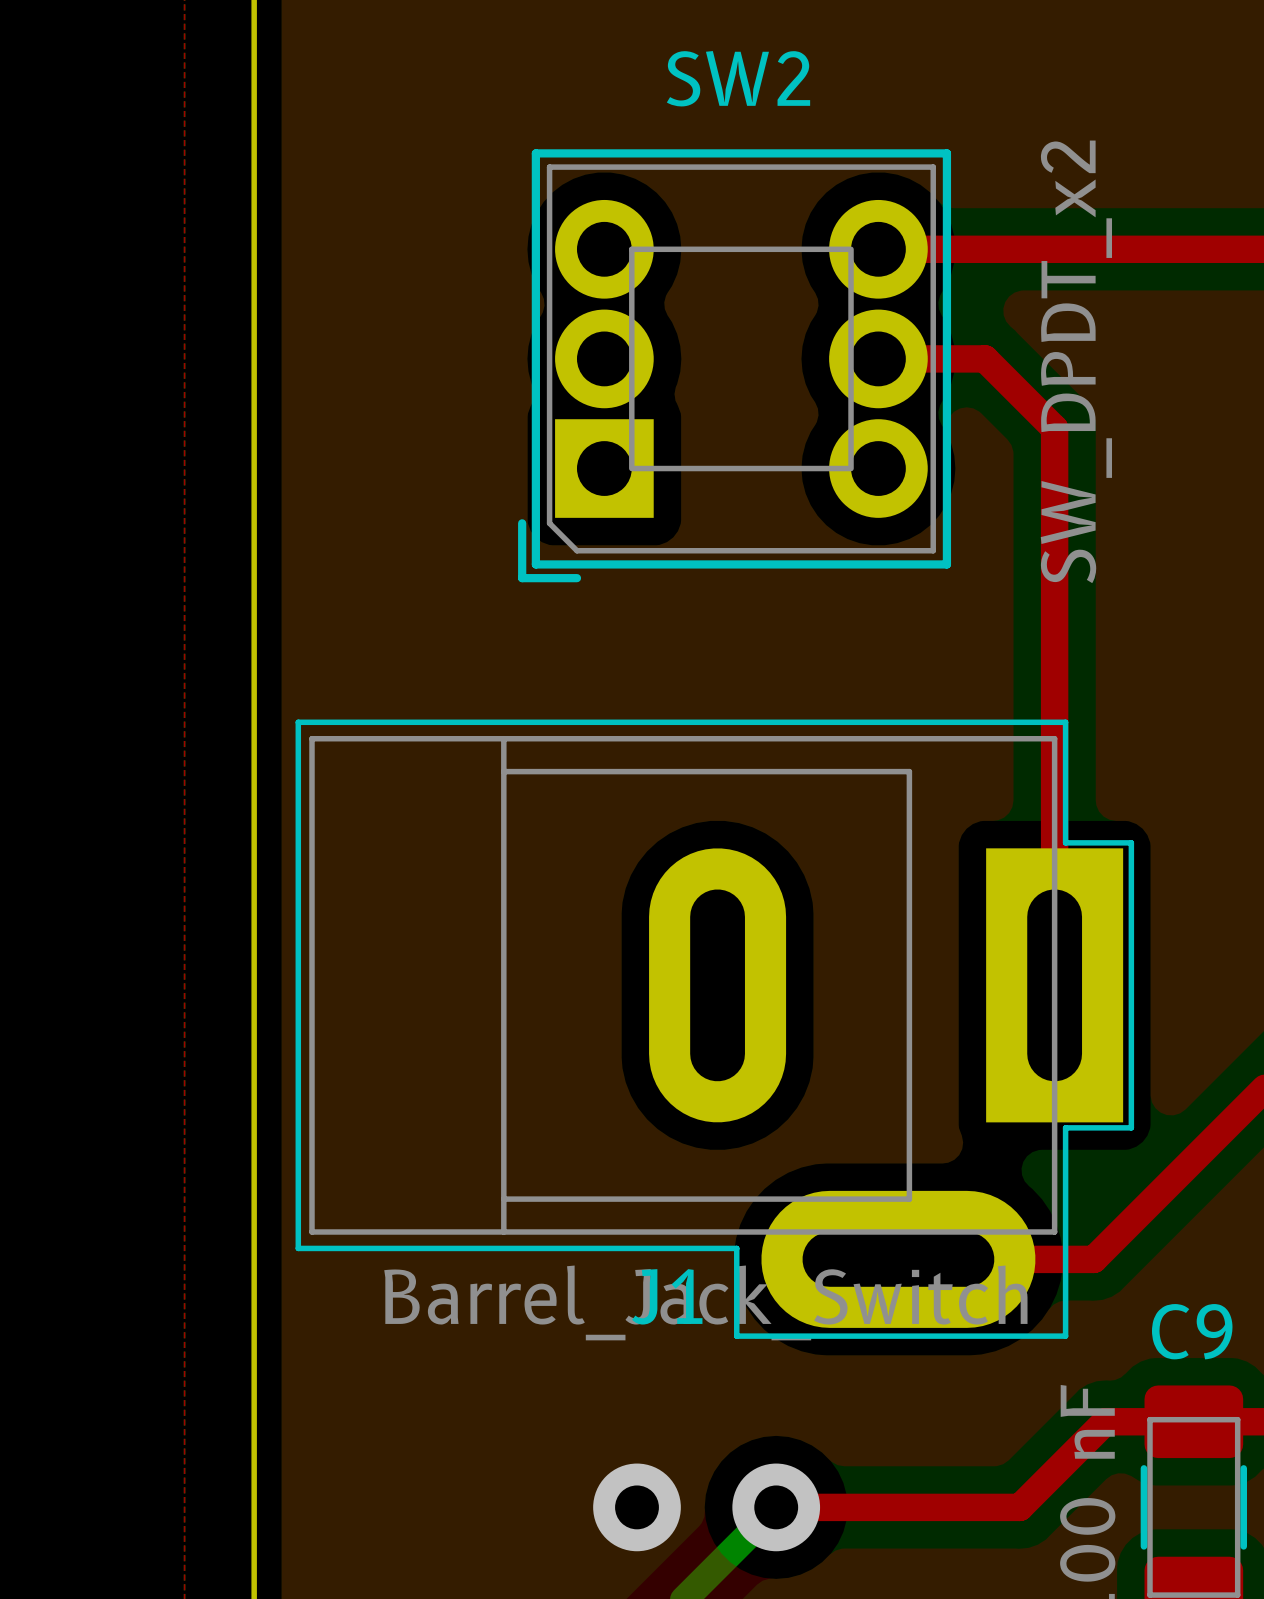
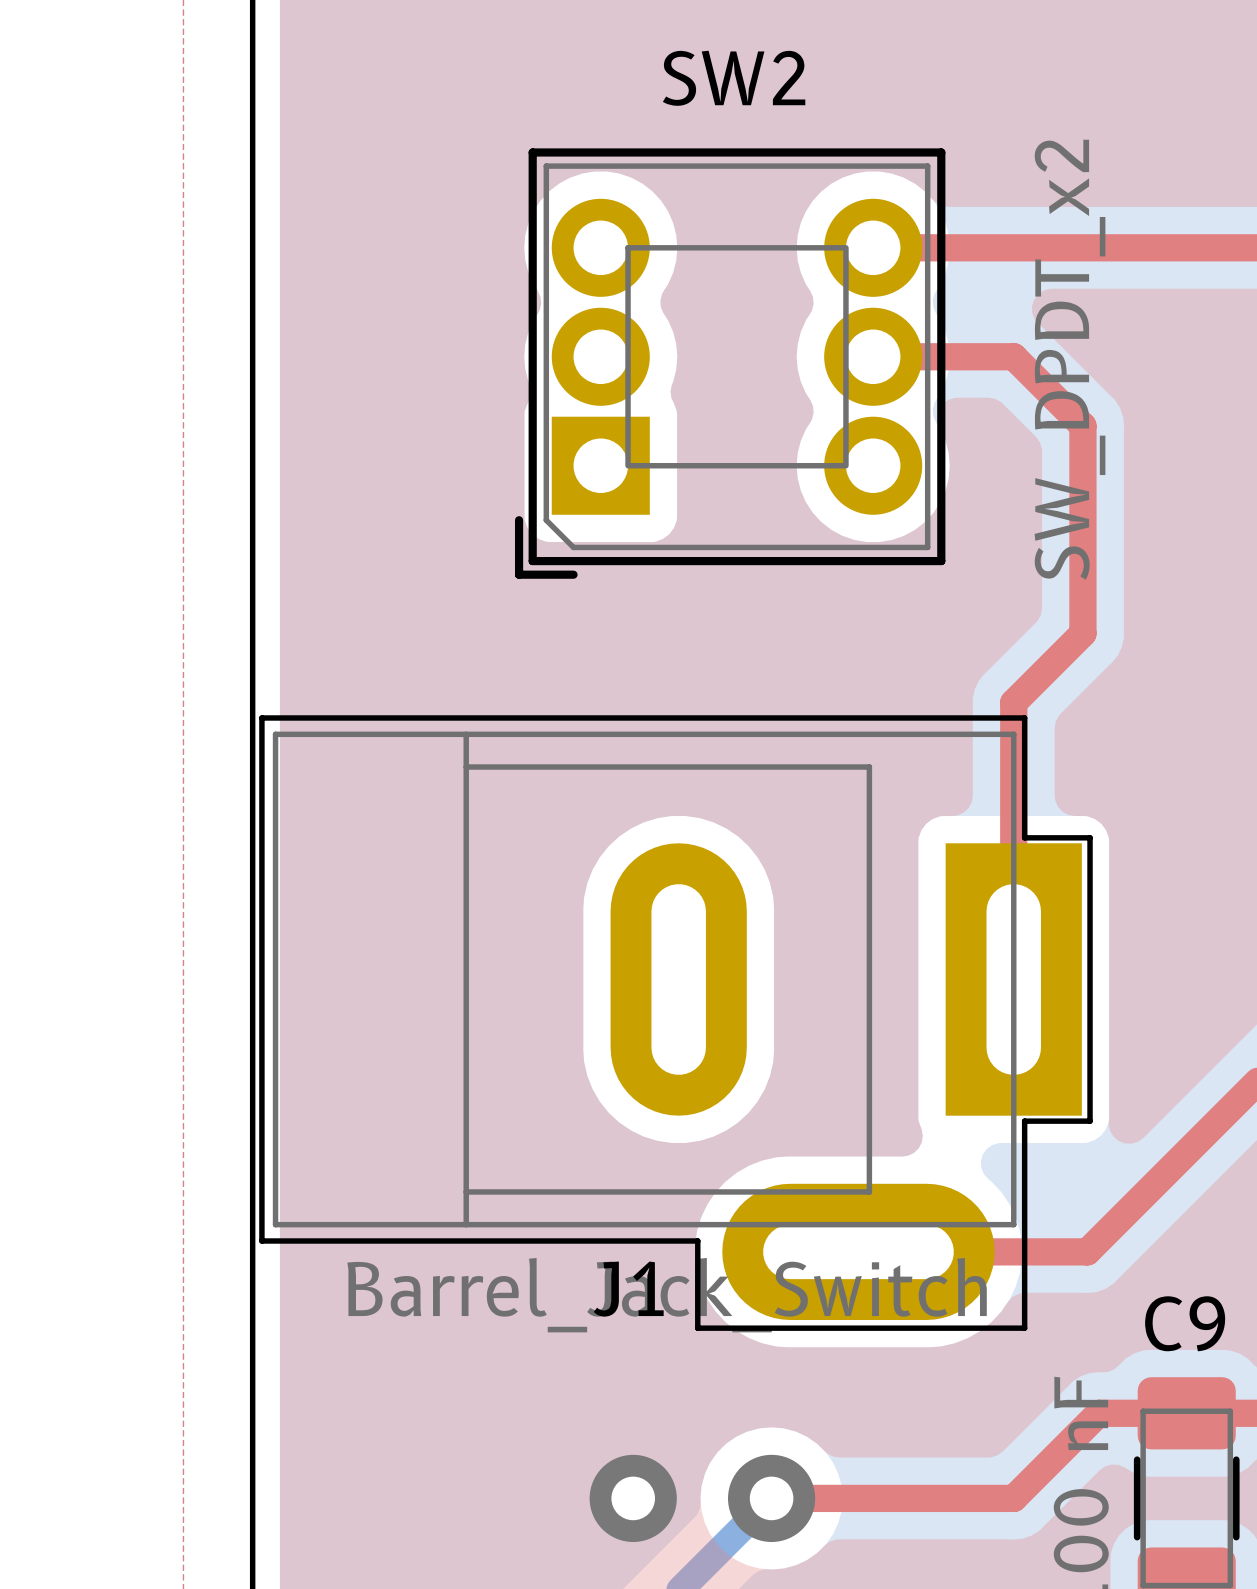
top track: (985, 358) (1054, 428) (1054, 985) -> (979, 356) (1013, 356) (1082, 425) (1082, 633) (1013, 702) (1013, 979)
J1 position: (714, 1029) -> (675, 1023)

